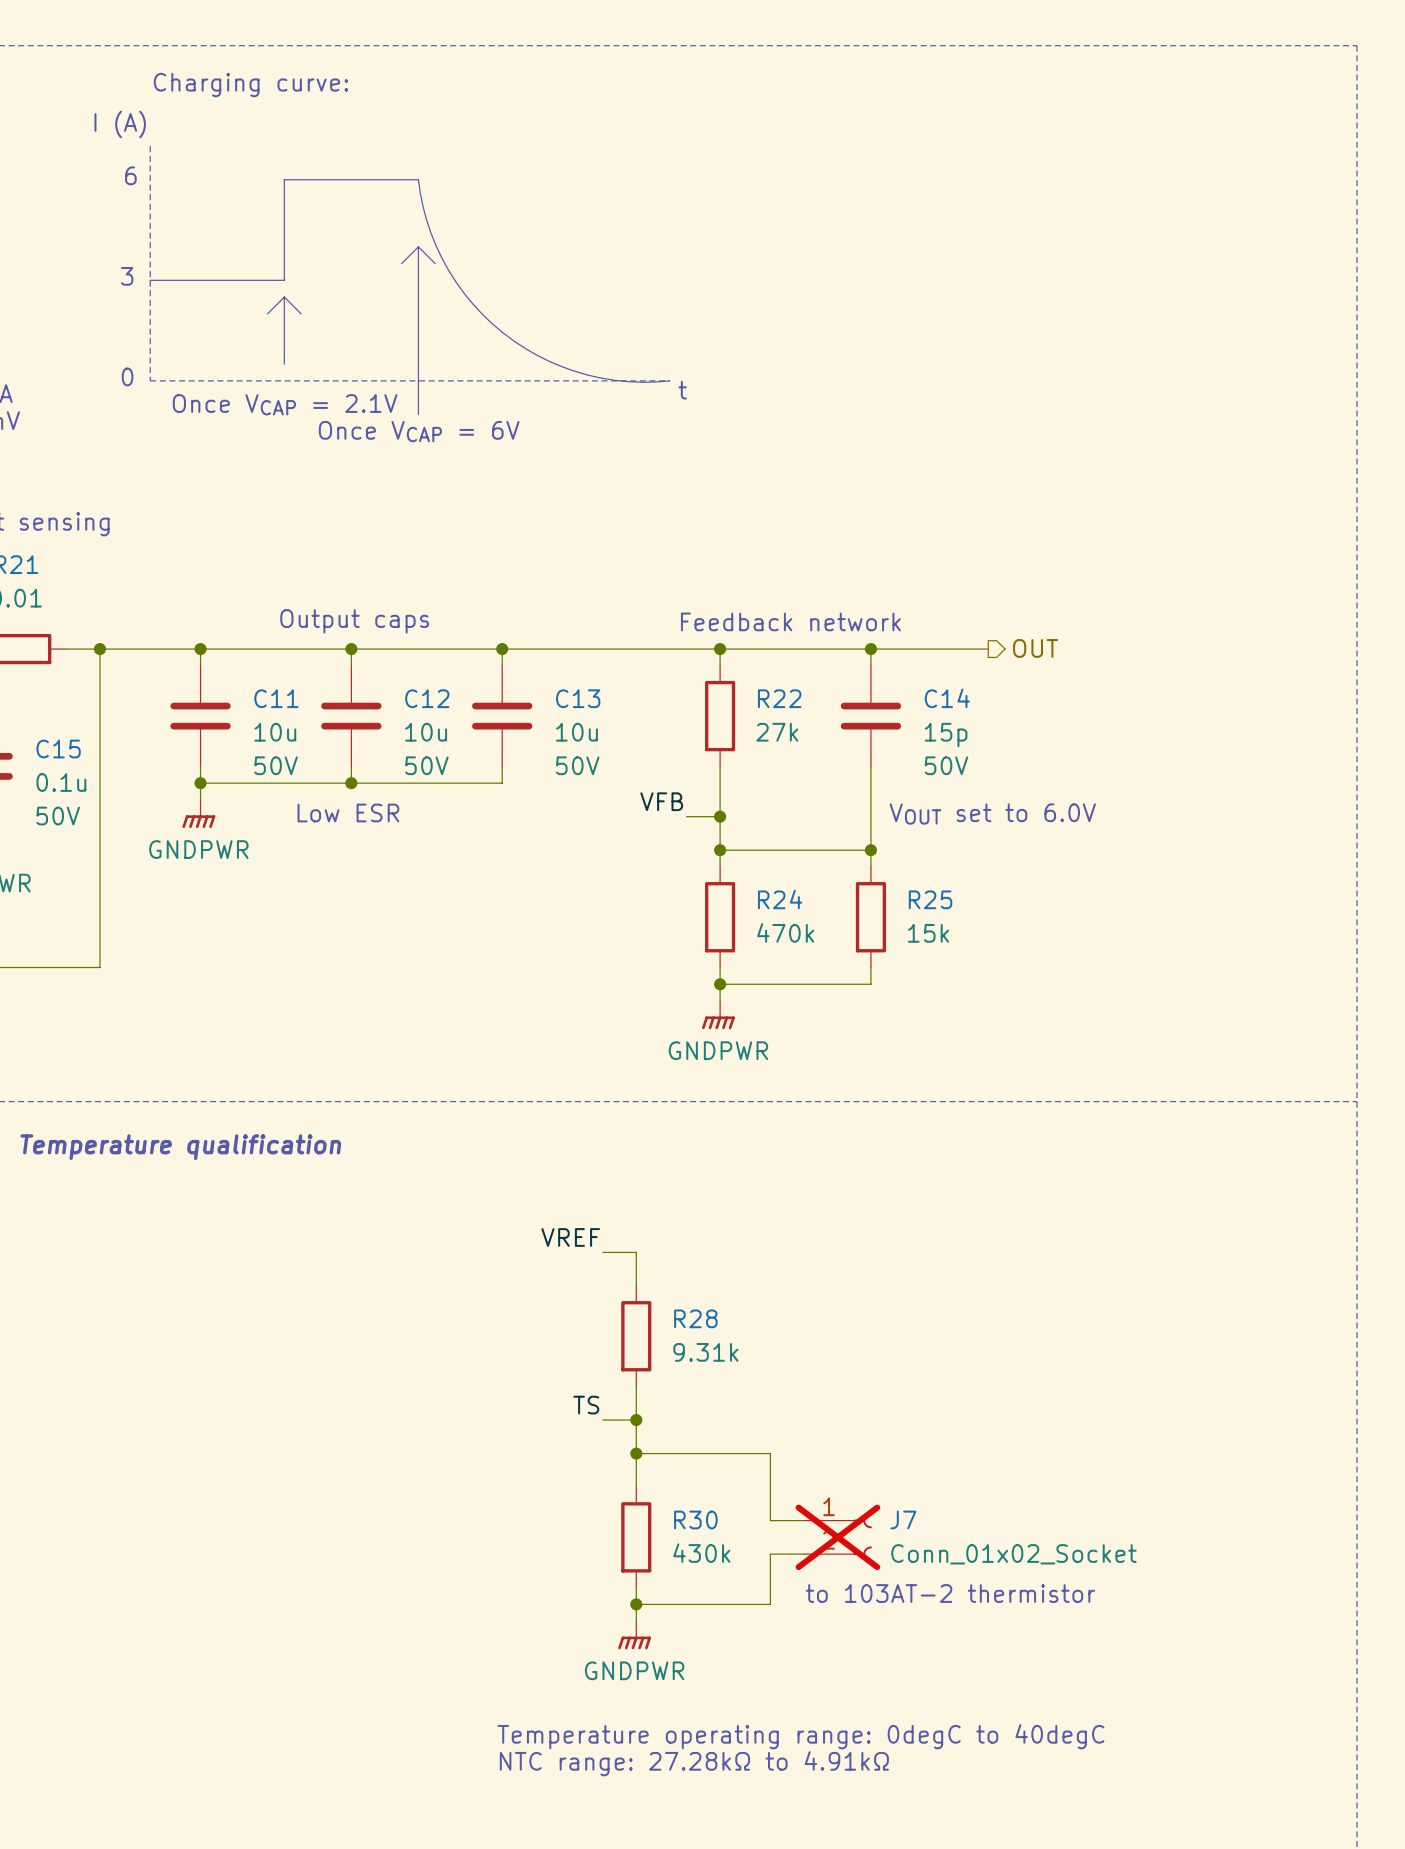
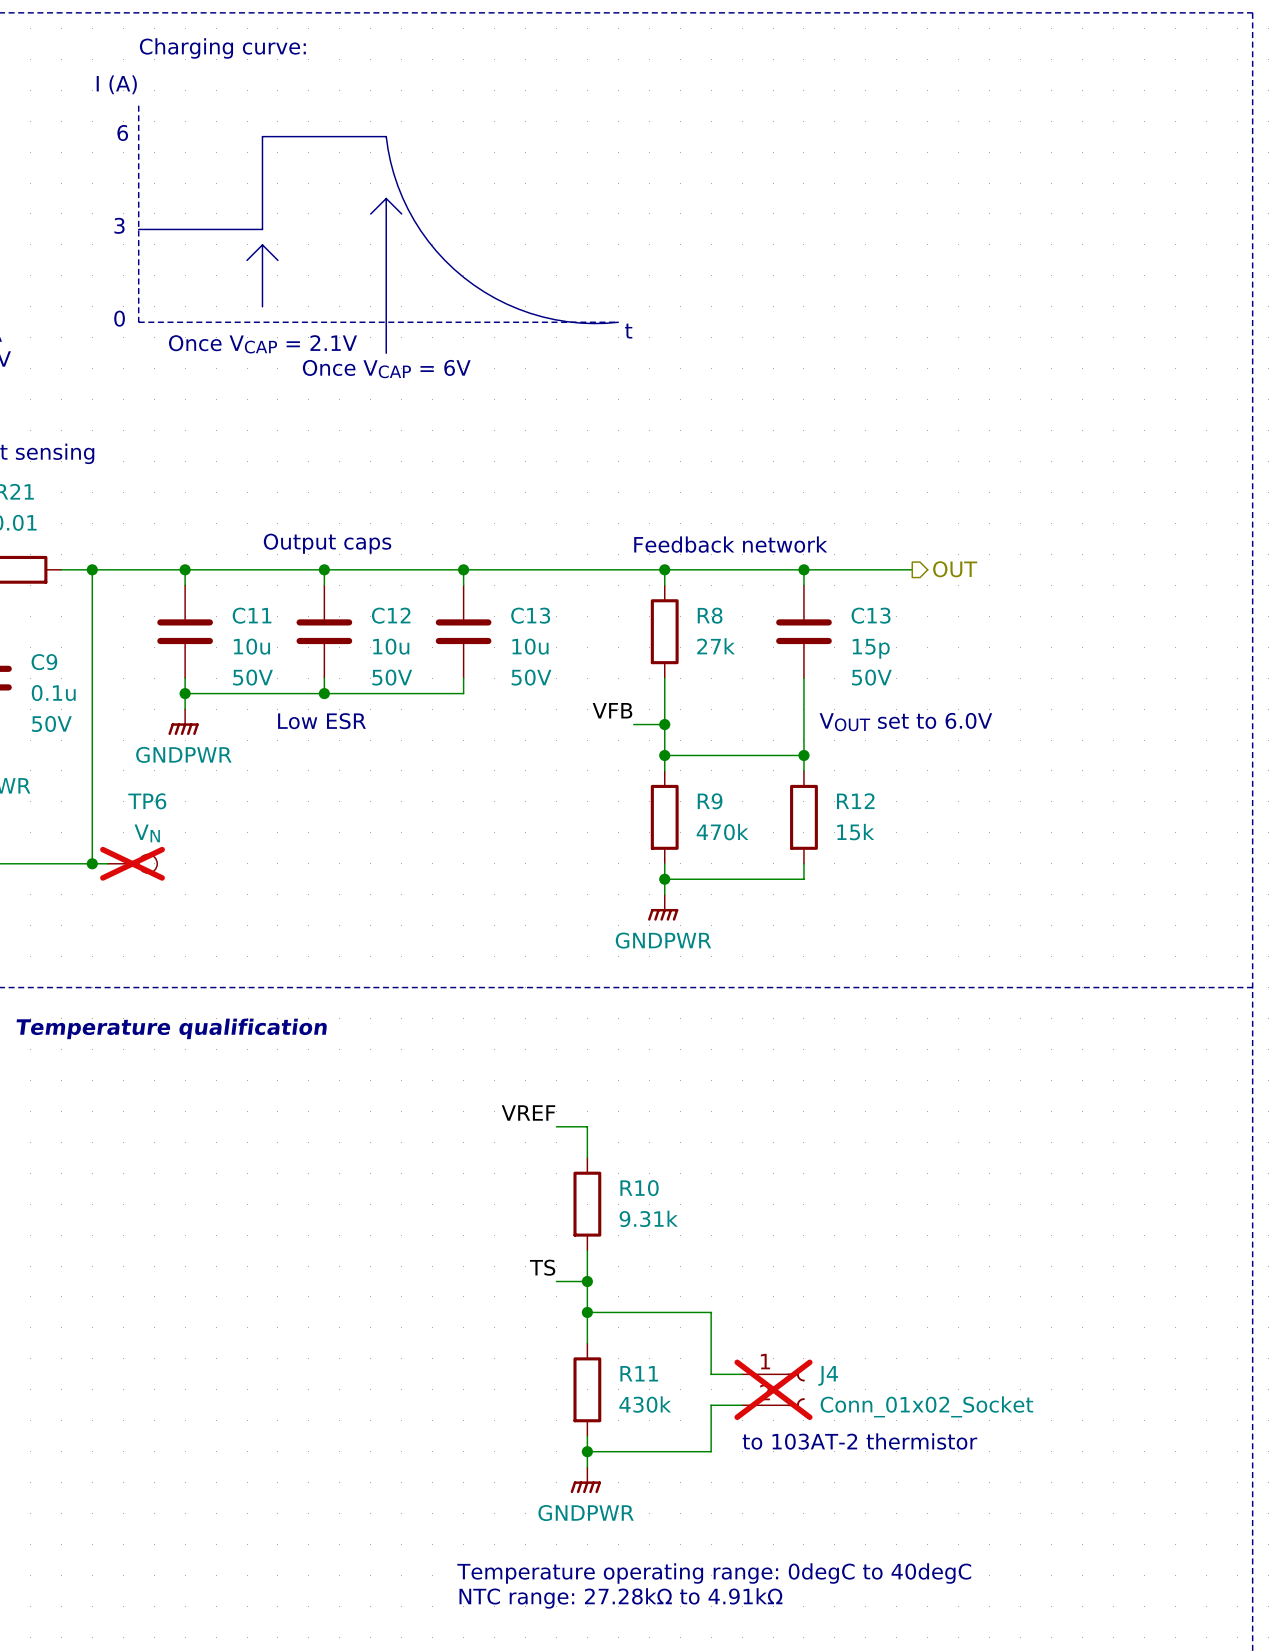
R22 name: R22 (779, 698) -> R8 (710, 615)
C14 name: C14 (947, 698) -> C13 (871, 615)
C15 name: C15 (58, 749) -> C9 (44, 662)
R24 name: R24 (780, 899) -> R9 (710, 801)
R25 name: R25 (930, 899) -> R12 (855, 801)
wire: none -> (92, 863) (107, 863)
junction: none -> (92, 863)
TP6: none -> VN (132, 863)
R28 name: R28 (695, 1318) -> R10 (639, 1188)
R30 name: R30 (695, 1519) -> R11 (639, 1373)
J7 name: J7 (903, 1519) -> J4 (828, 1375)

